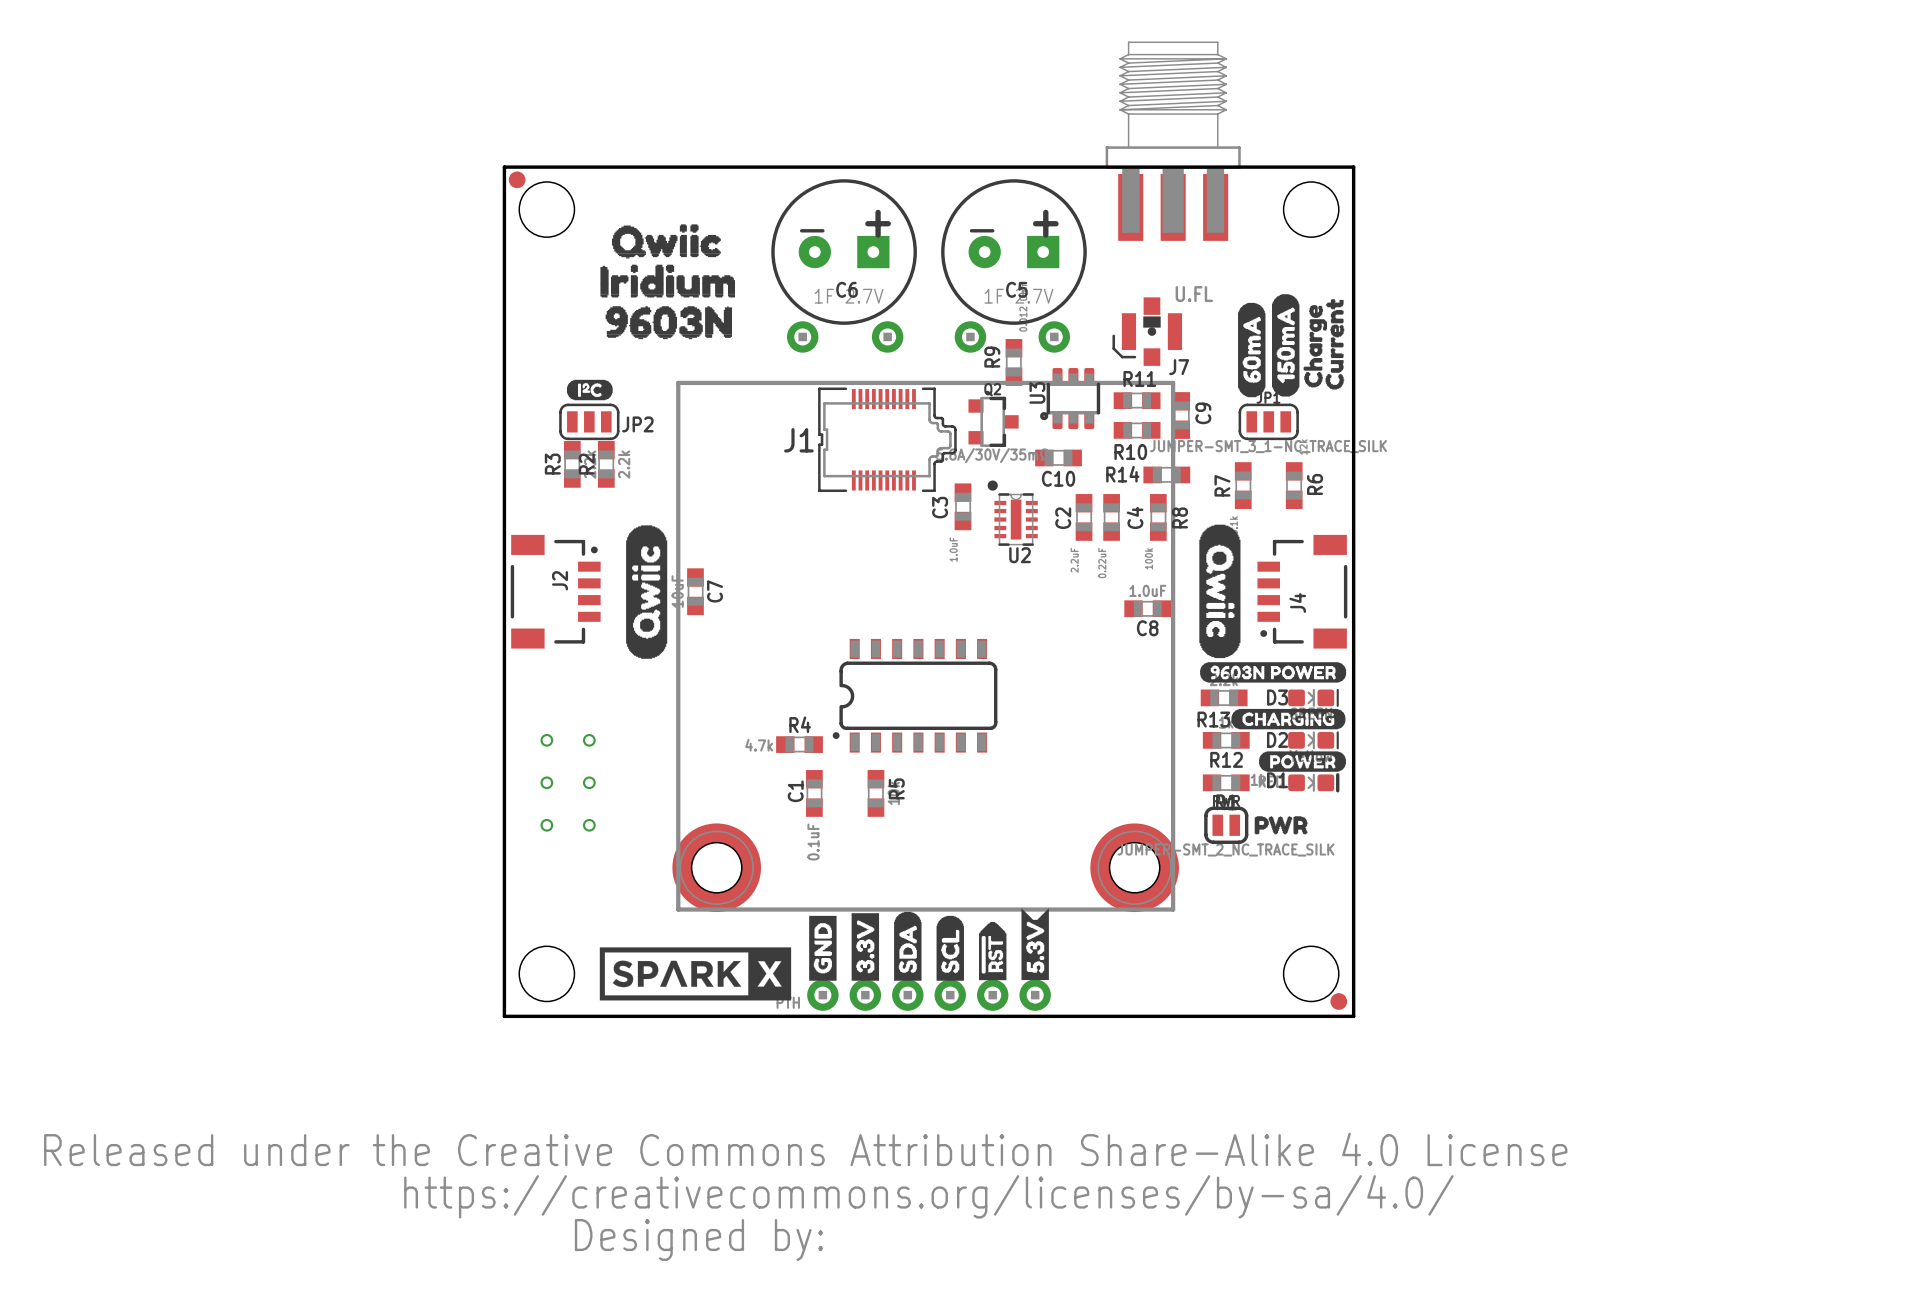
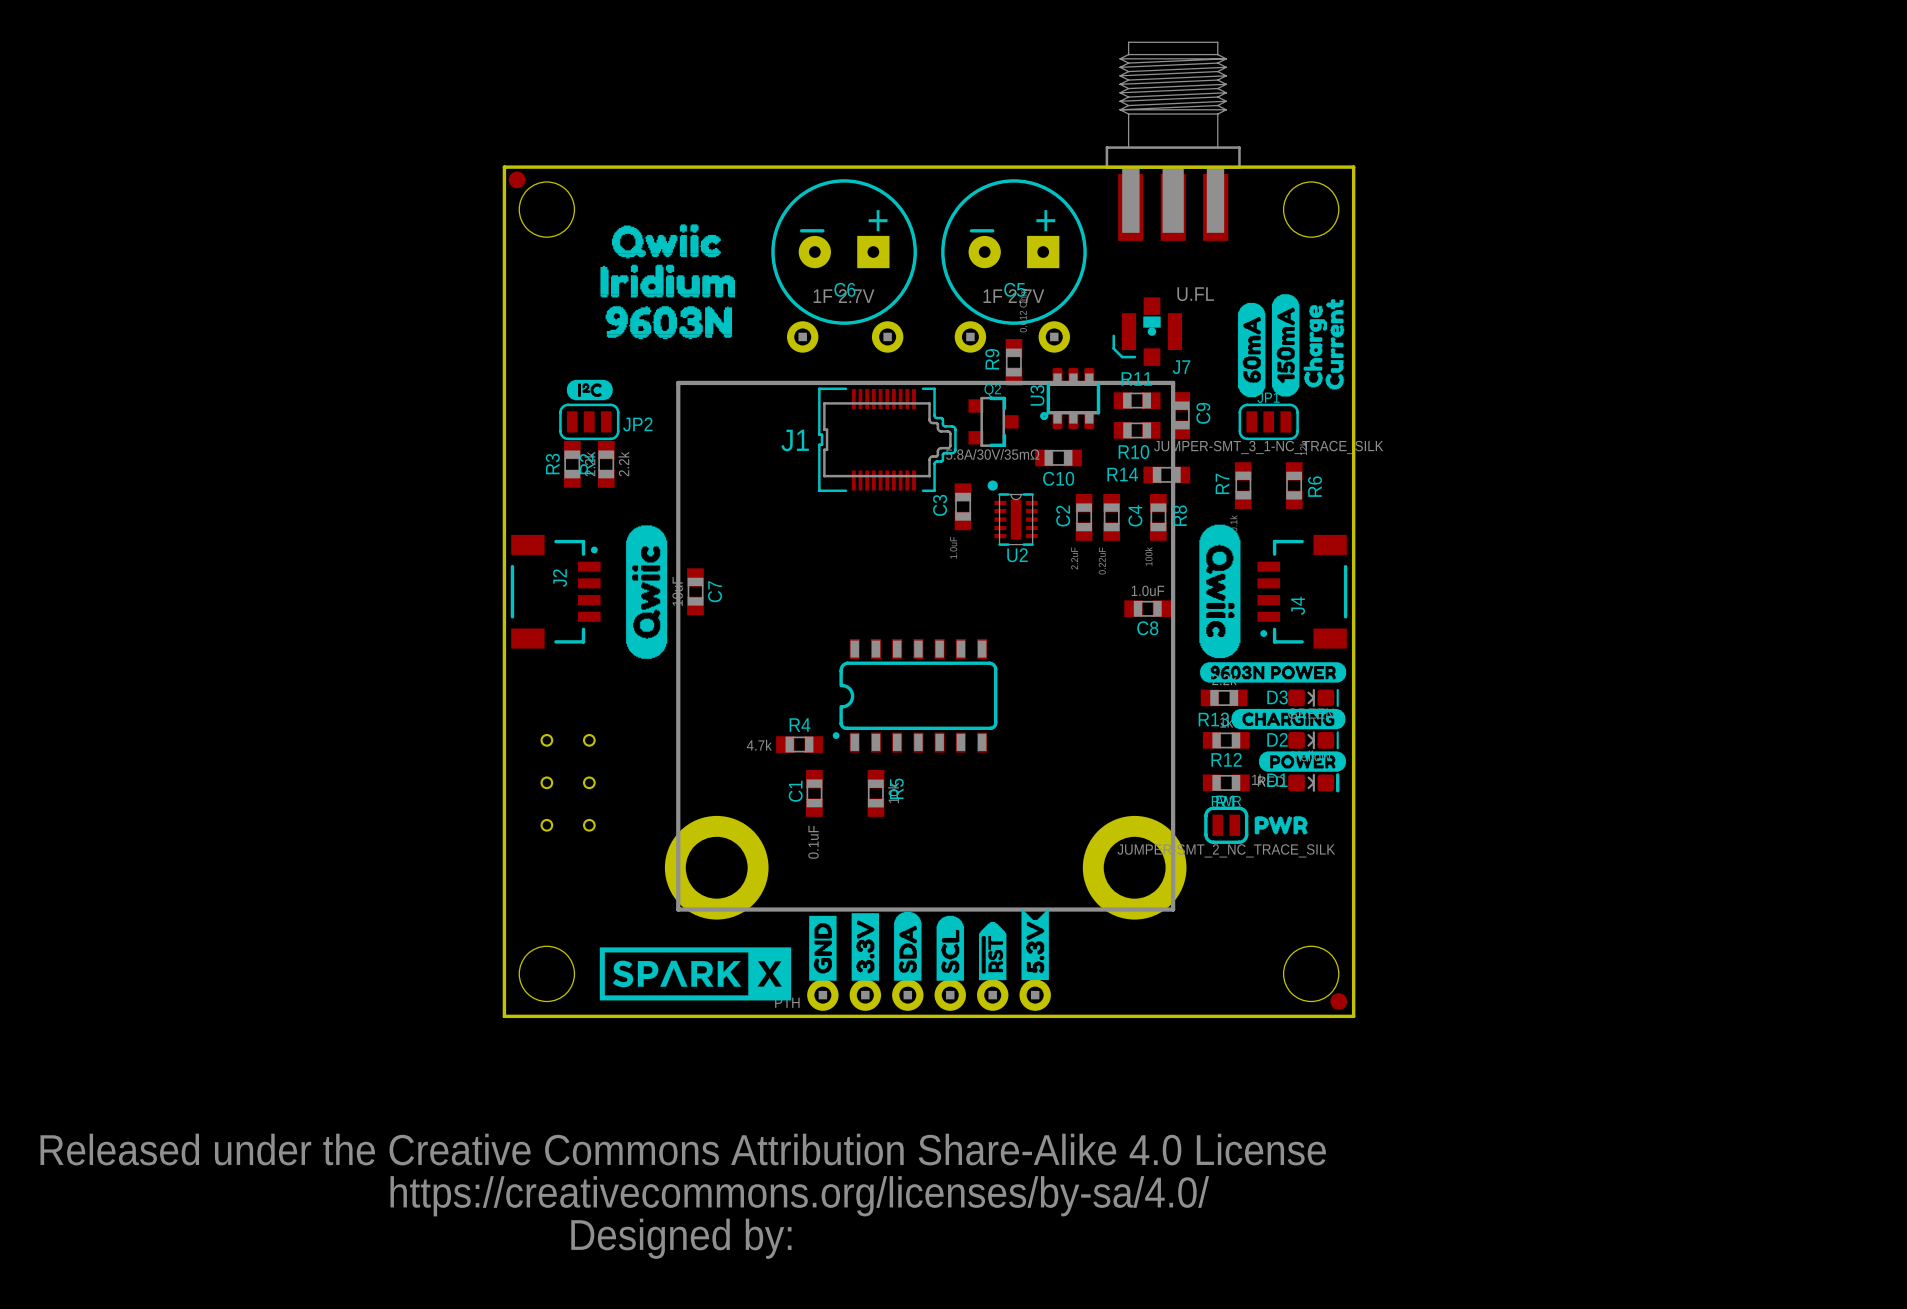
J1 footprint: [672, 380, 1179, 913] -> [664, 380, 1187, 920]

